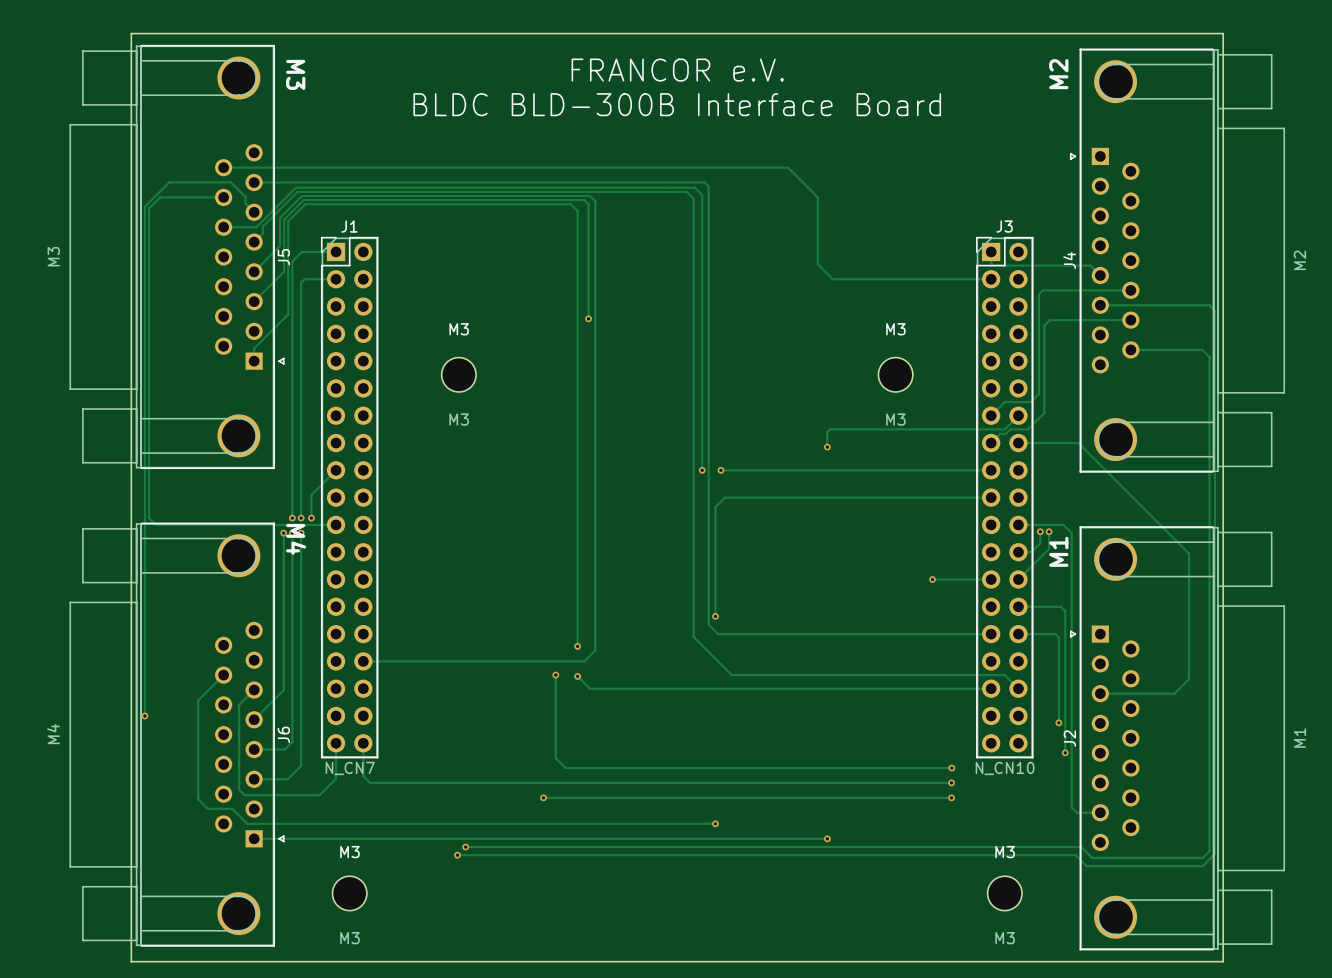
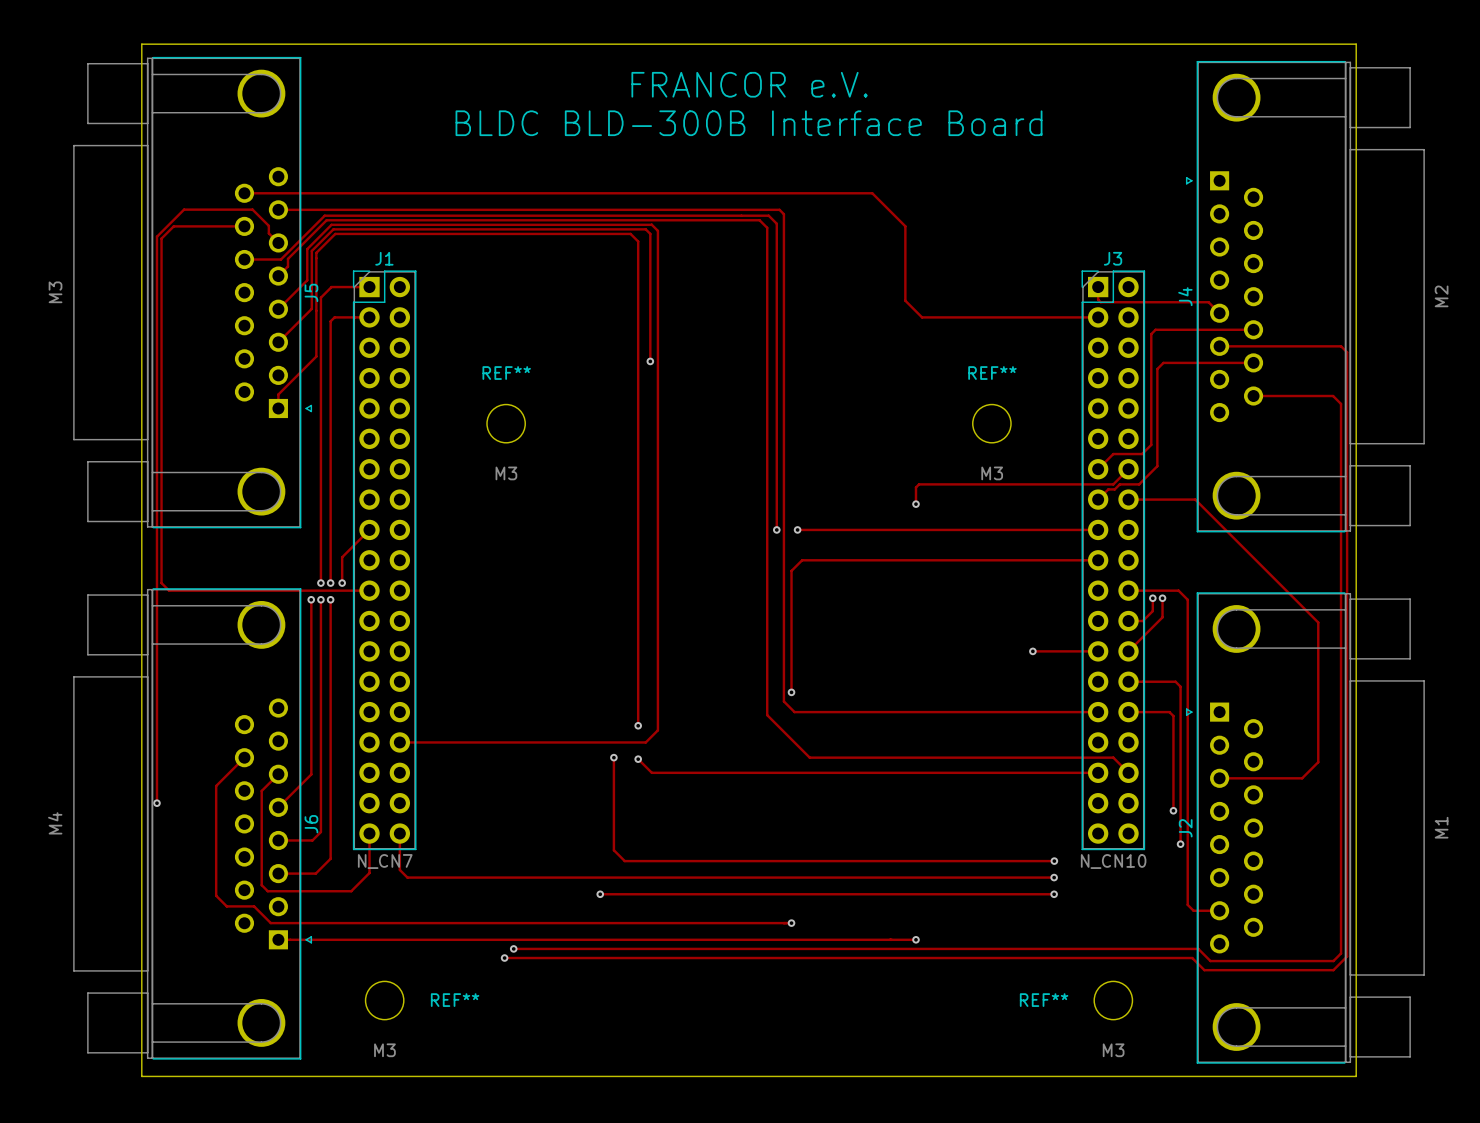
text: M3 (295, 74) -> none
text: M2 (1058, 74) -> none
M3 name: M3 (459, 329) -> REF** (506, 373)
M3 name: M3 (895, 329) -> REF** (992, 373)
text: M4 (296, 539) -> none
text: M1 (1058, 551) -> none
M3 name: M3 (349, 852) -> REF** (455, 1000)
M3 name: M3 (1005, 852) -> REF** (1044, 1000)

